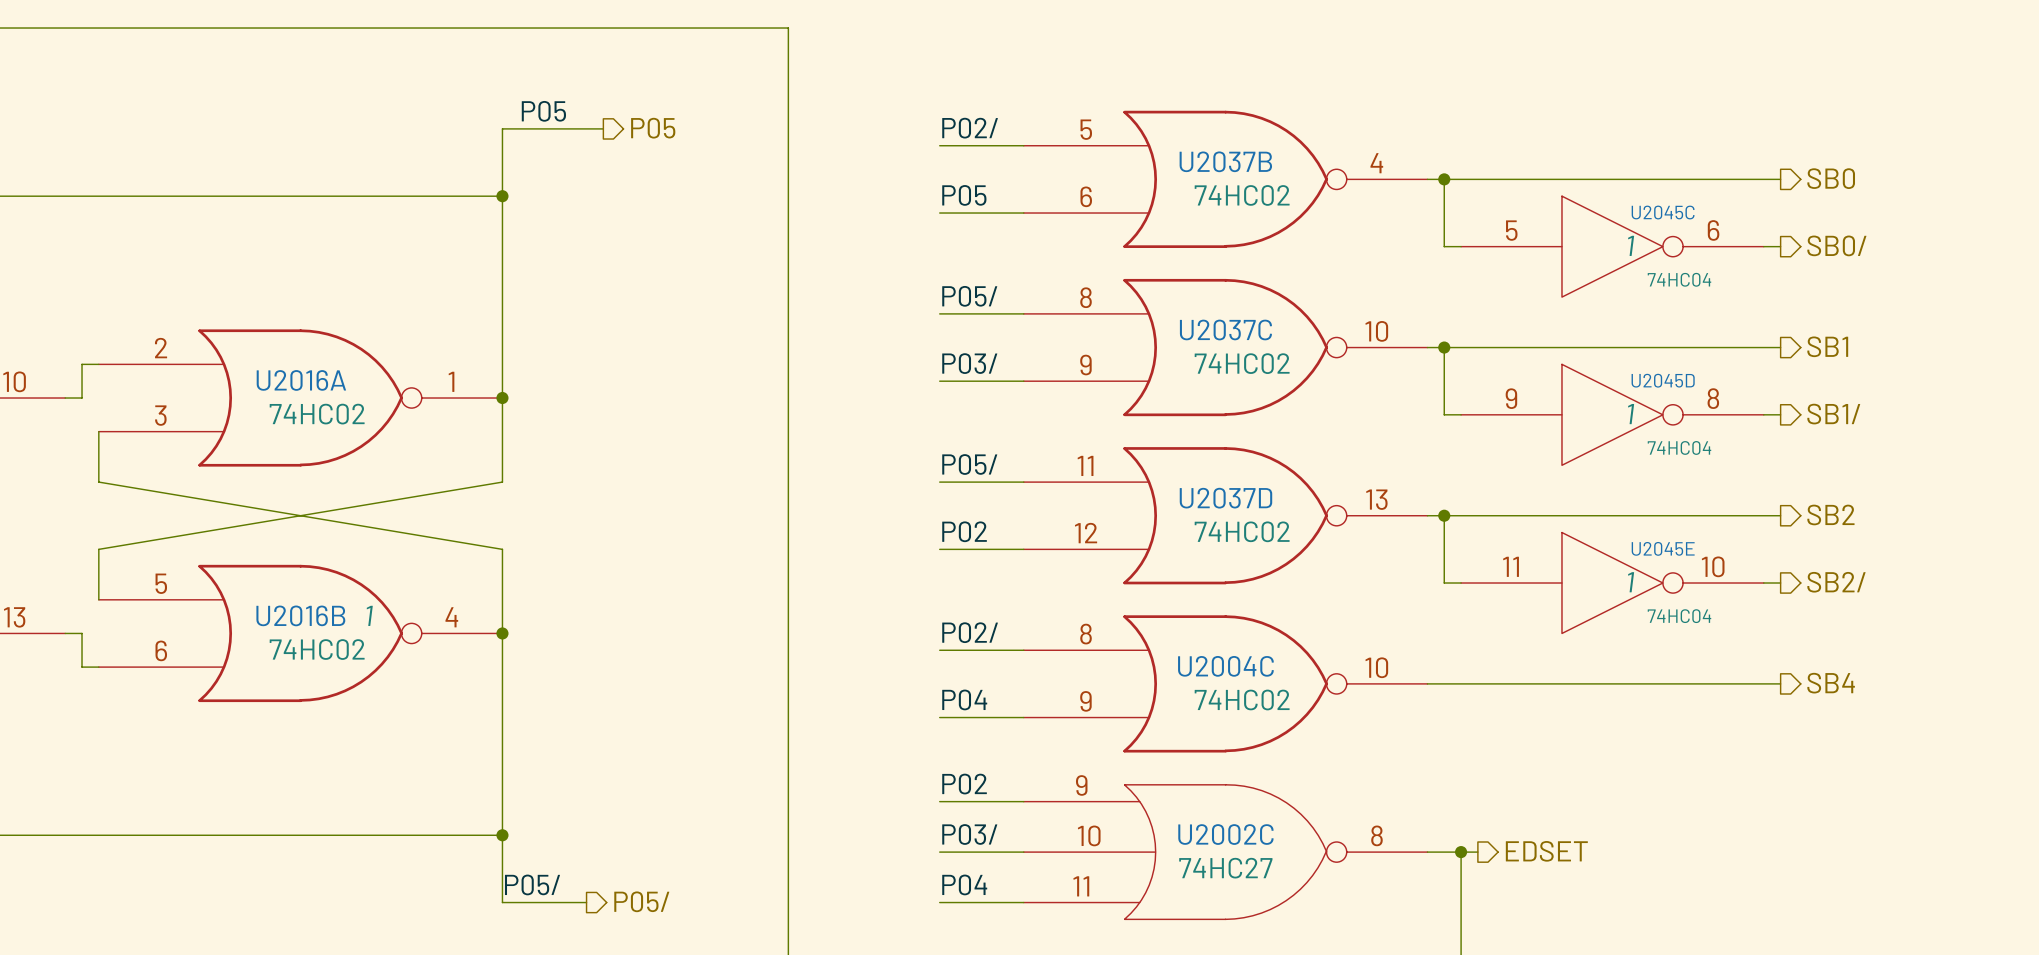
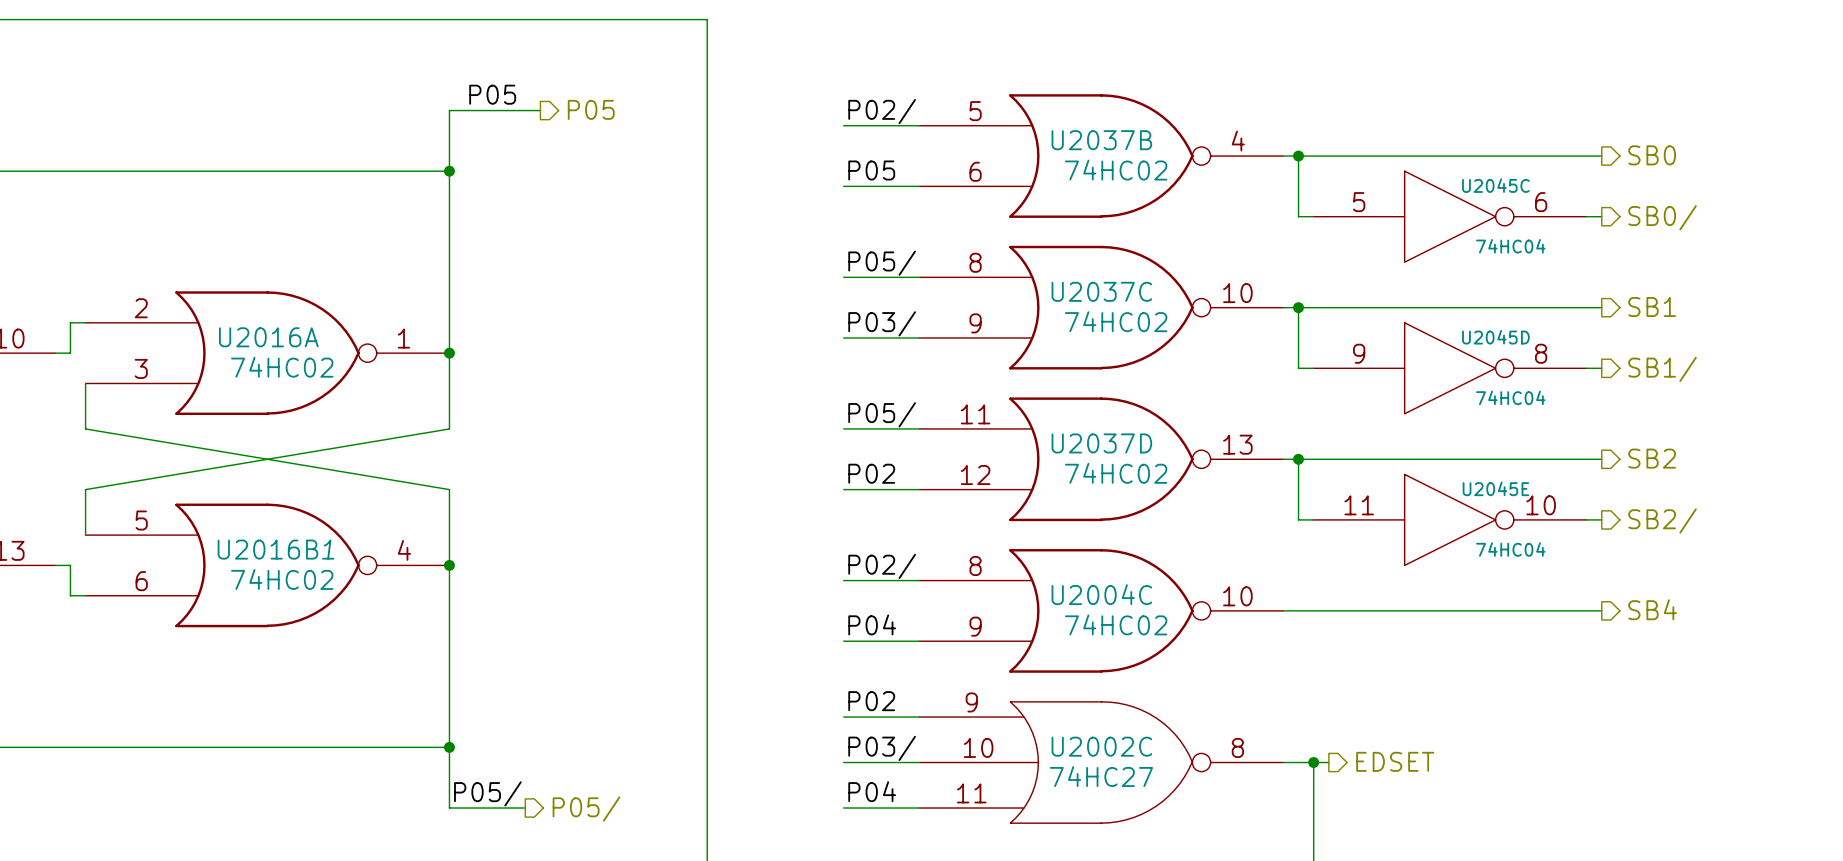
U2045C text: 1 (1631, 245) -> none
U2045D text: 1 (1631, 414) -> none
U2045E text: 1 (1631, 582) -> none

